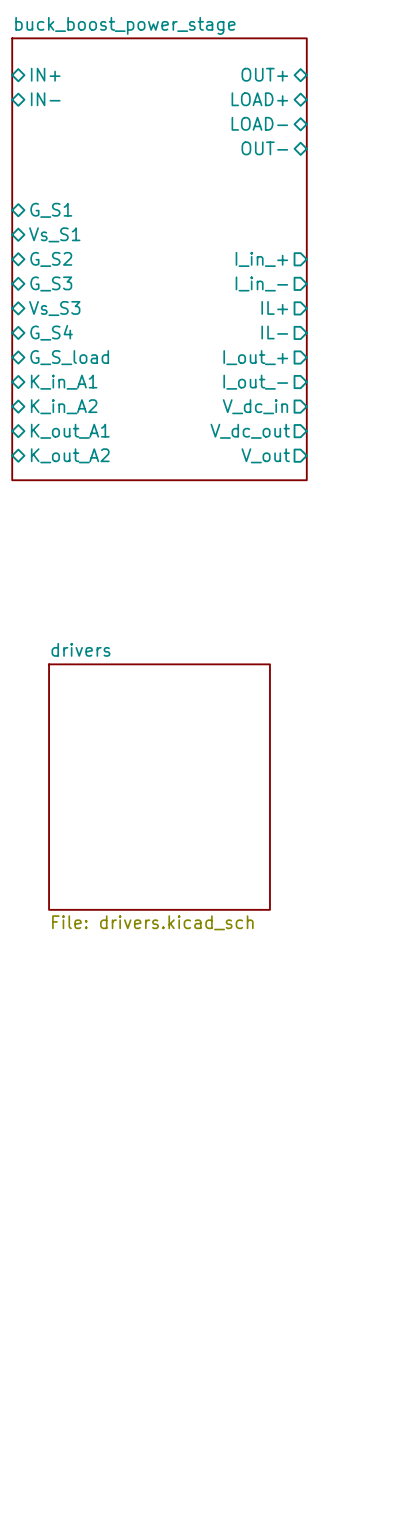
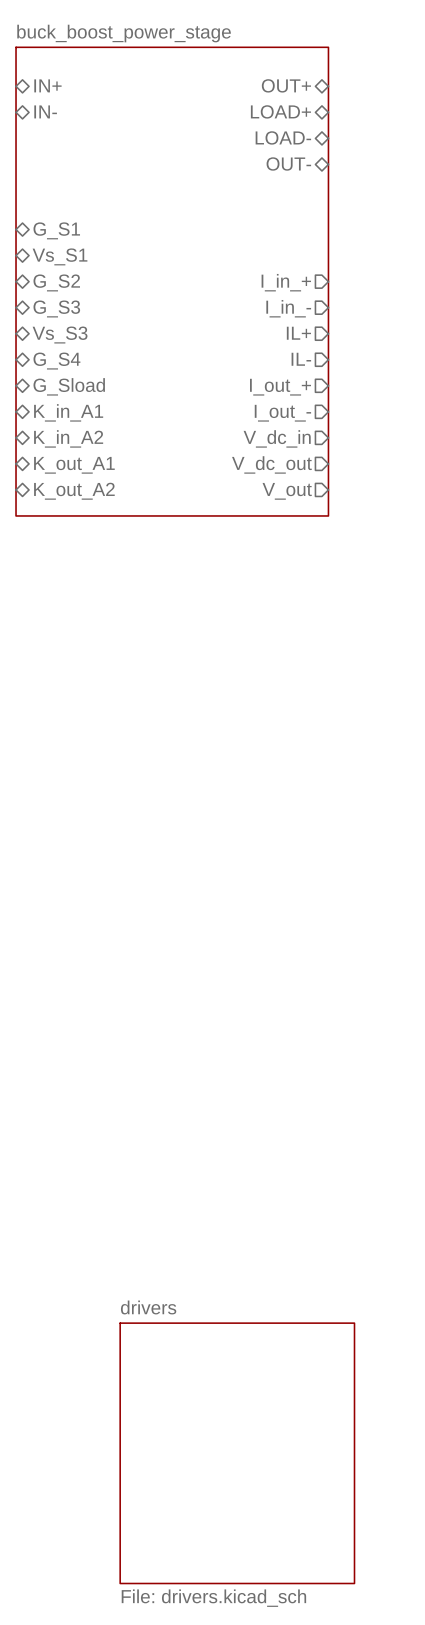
sheet pin: G_S_load (69, 357) -> G_Sload (69, 386)
sheet drivers: File: drivers.kicad_sch (159, 787) -> none
sheet drivers: none -> File: drivers.kicad_sch (237, 1453)

